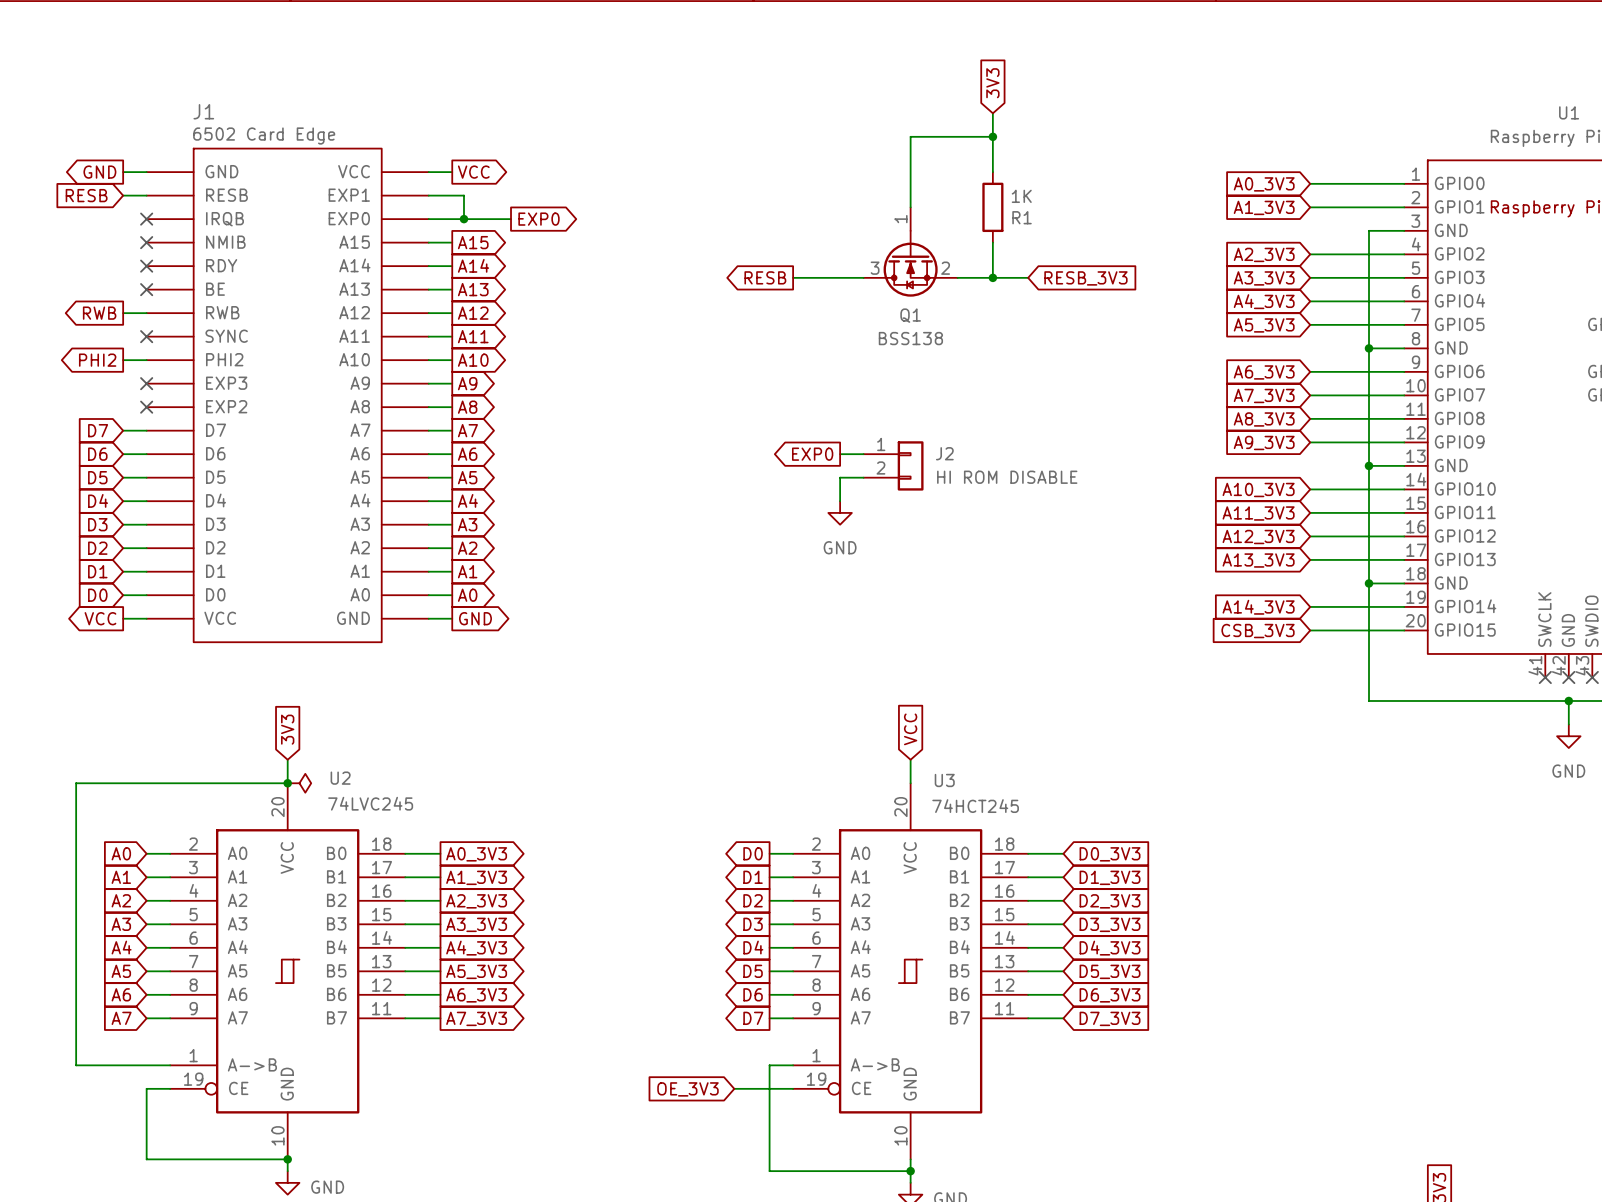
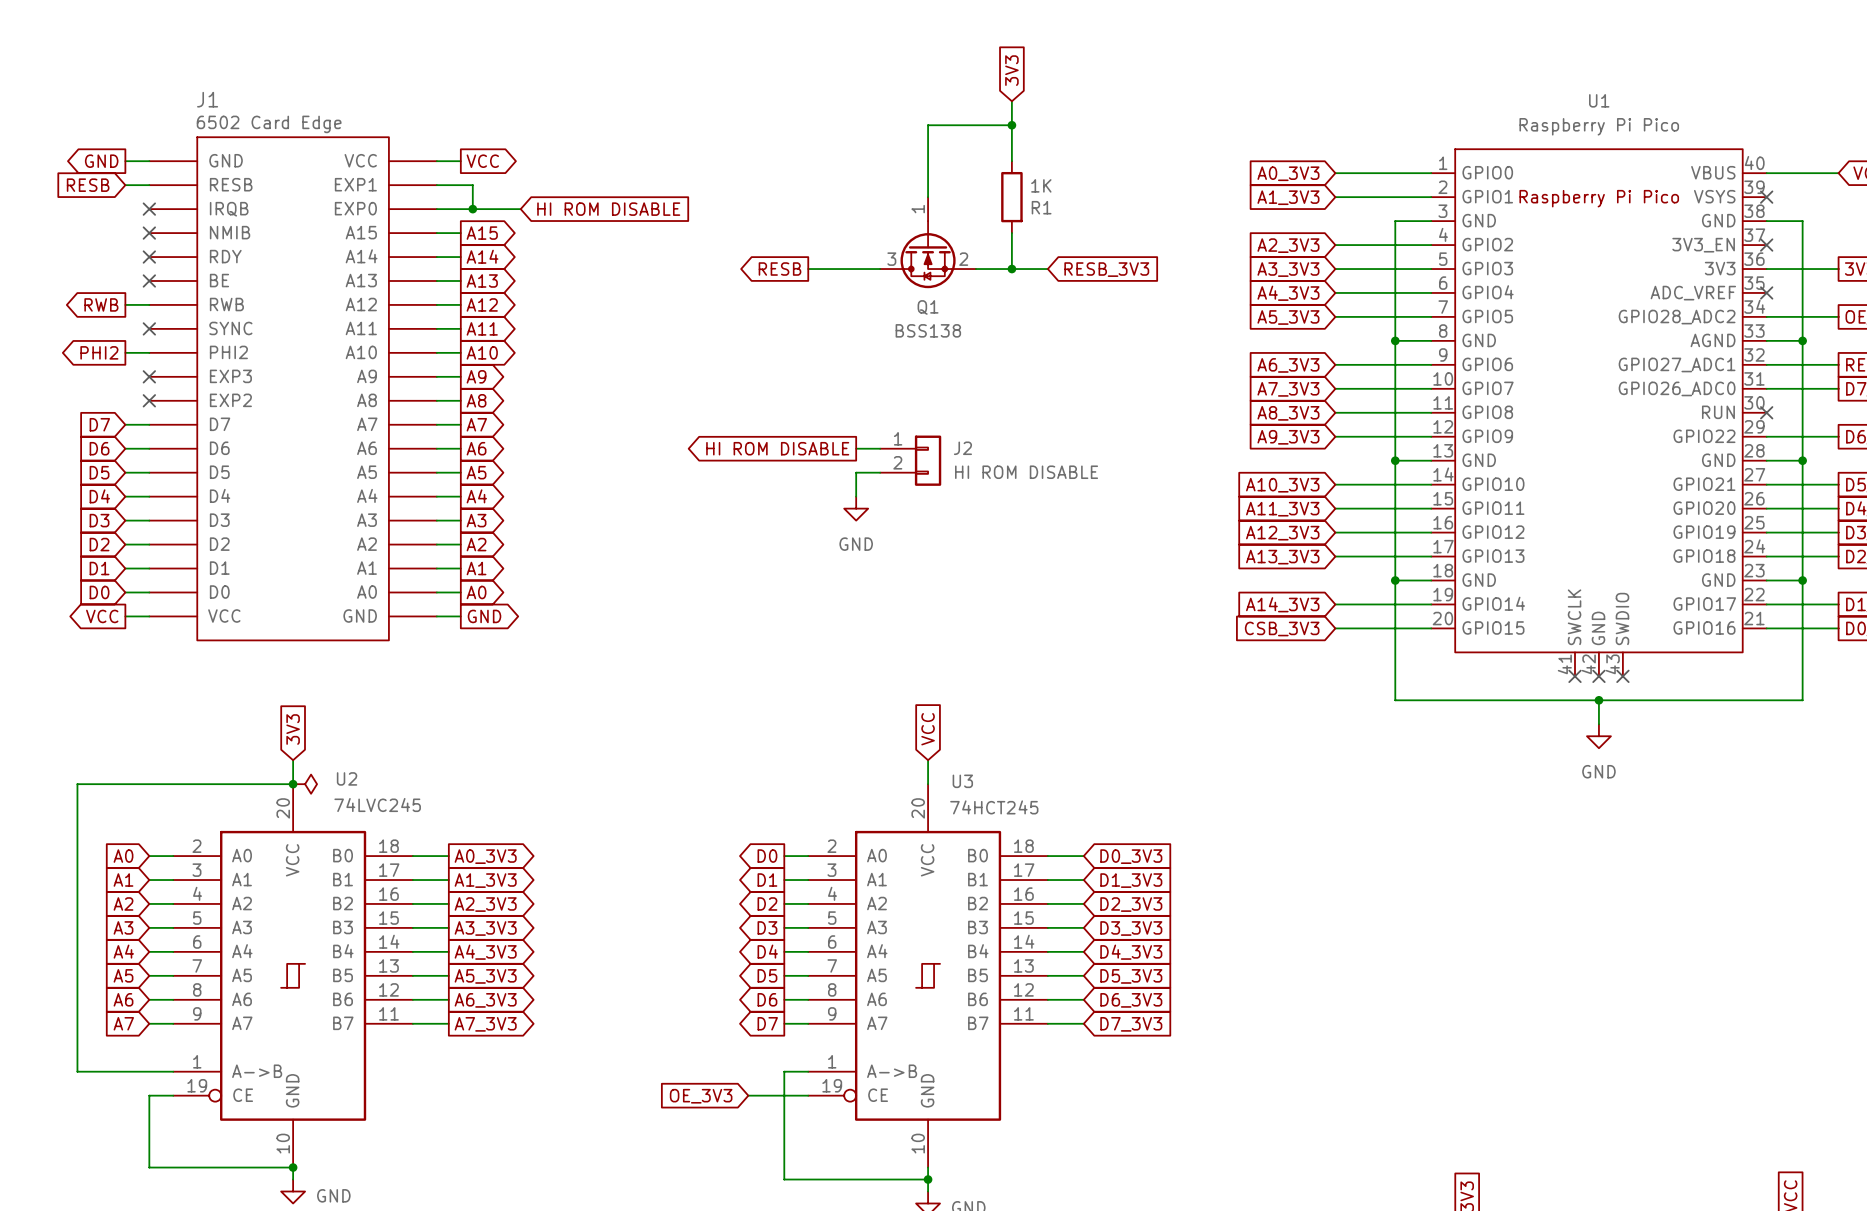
global label shape: output (539, 219) -> input (608, 209)
global label: EXP0 (539, 219) -> HI ROM DISABLE (608, 209)
global label: EXP0 (812, 454) -> HI ROM DISABLE (777, 448)

